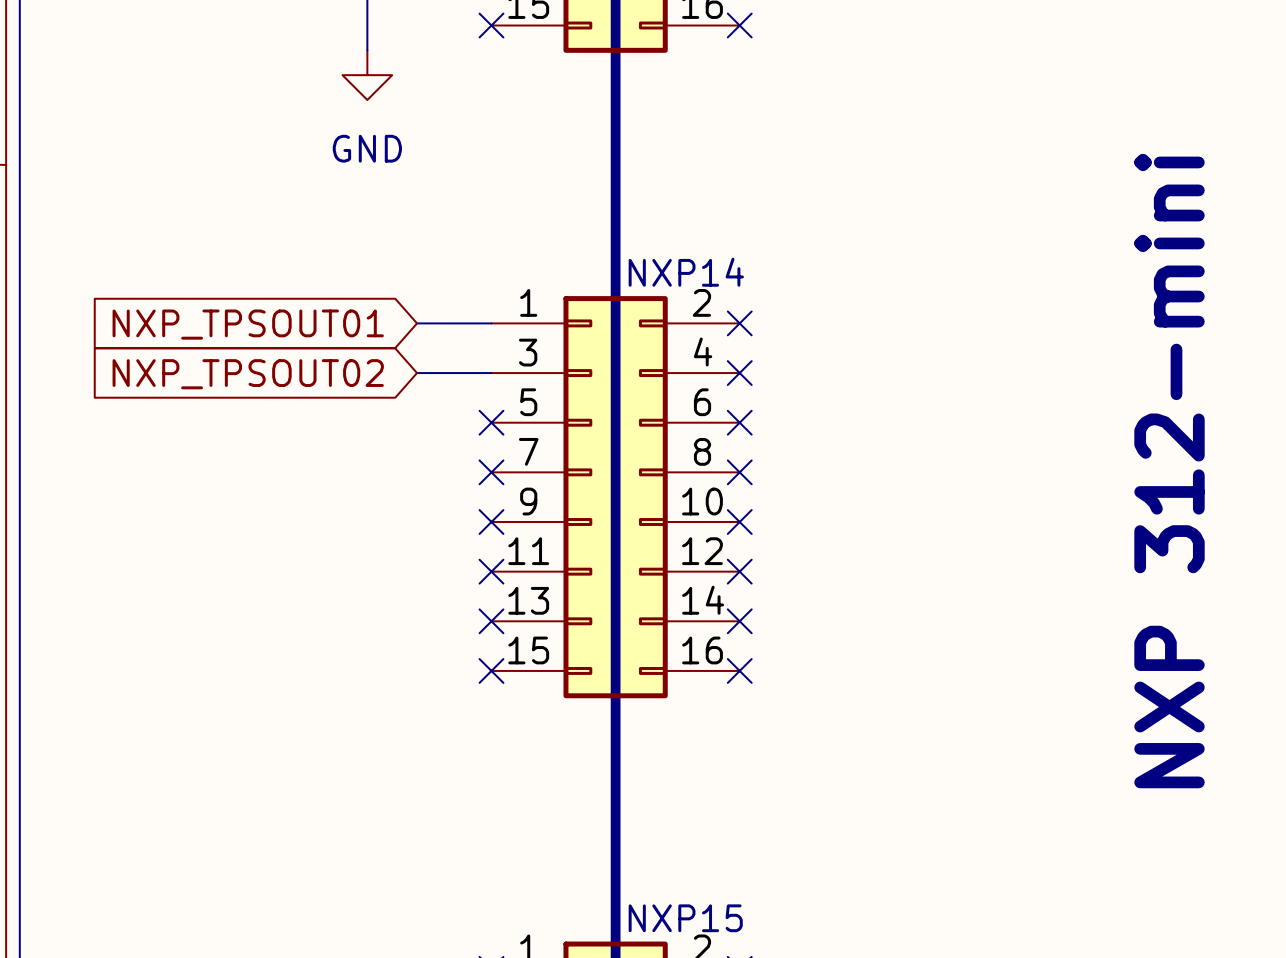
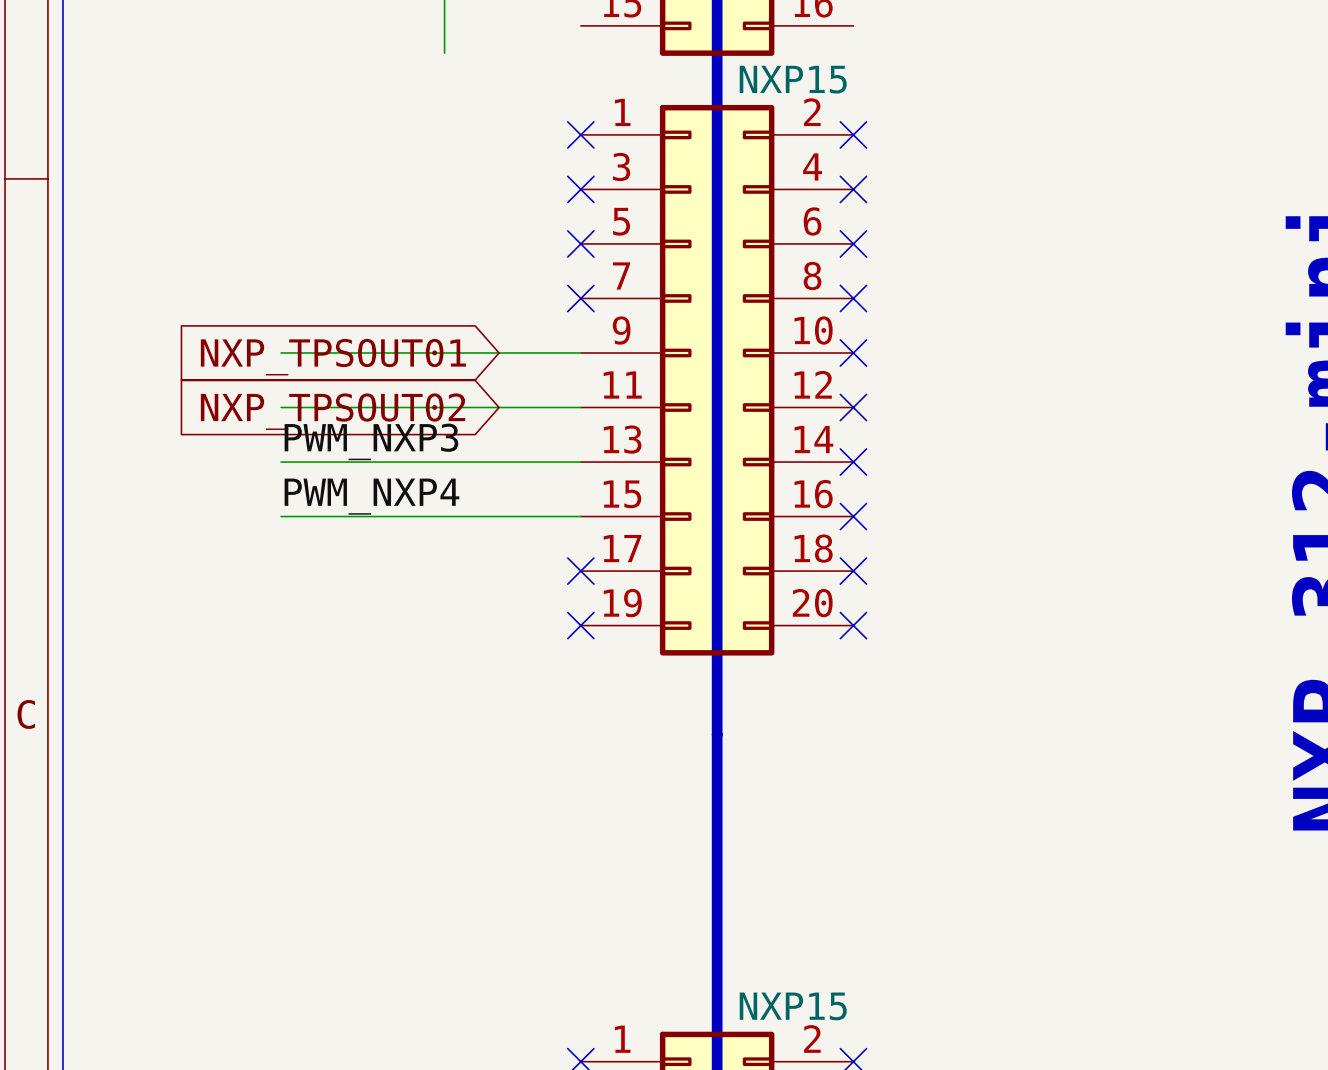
no-connect mark: (491, 25) -> none
no-connect mark: (739, 25) -> none
power symbol: GND (367, 75) -> none
no-connect mark: none -> (580, 134)
no-connect mark: none -> (853, 134)
no-connect mark: none -> (580, 189)
no-connect mark: none -> (853, 189)
no-connect mark: none -> (580, 243)
no-connect mark: none -> (853, 243)
no-connect mark: none -> (580, 298)
no-connect mark: none -> (853, 298)
wire: none -> (281, 352) (499, 352)
part: none -> NXP15 (717, 380)
wire: none -> (281, 407) (499, 407)
label: none -> PWM_NXP3 (371, 441)
wire: none -> (281, 462) (580, 462)
no-connect mark: (491, 422) -> none
label: none -> PWM_NXP4 (371, 496)
wire: none -> (281, 516) (580, 516)
no-connect mark: (491, 472) -> none
part: NXP14 (615, 497) -> none
no-connect mark: (491, 621) -> none
no-connect mark: (739, 621) -> none
no-connect mark: (491, 670) -> none
no-connect mark: (739, 670) -> none

